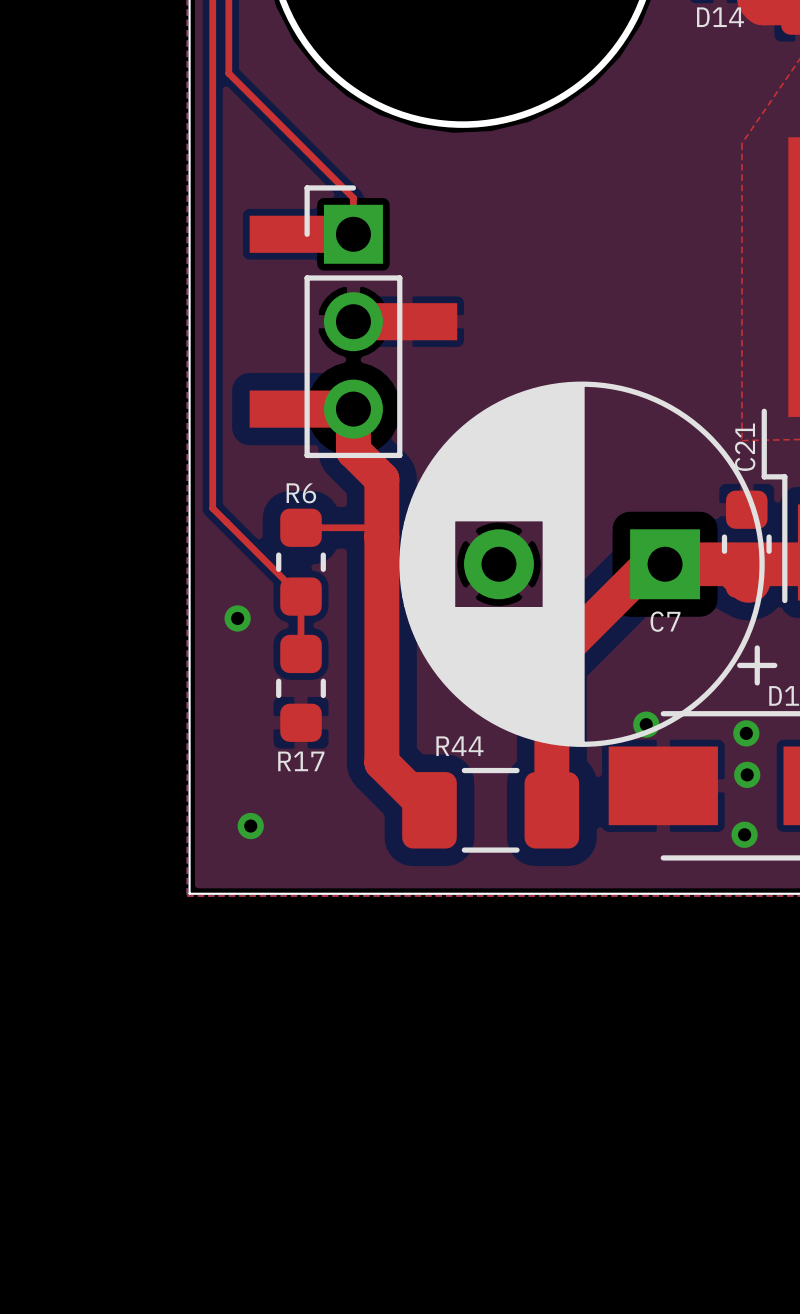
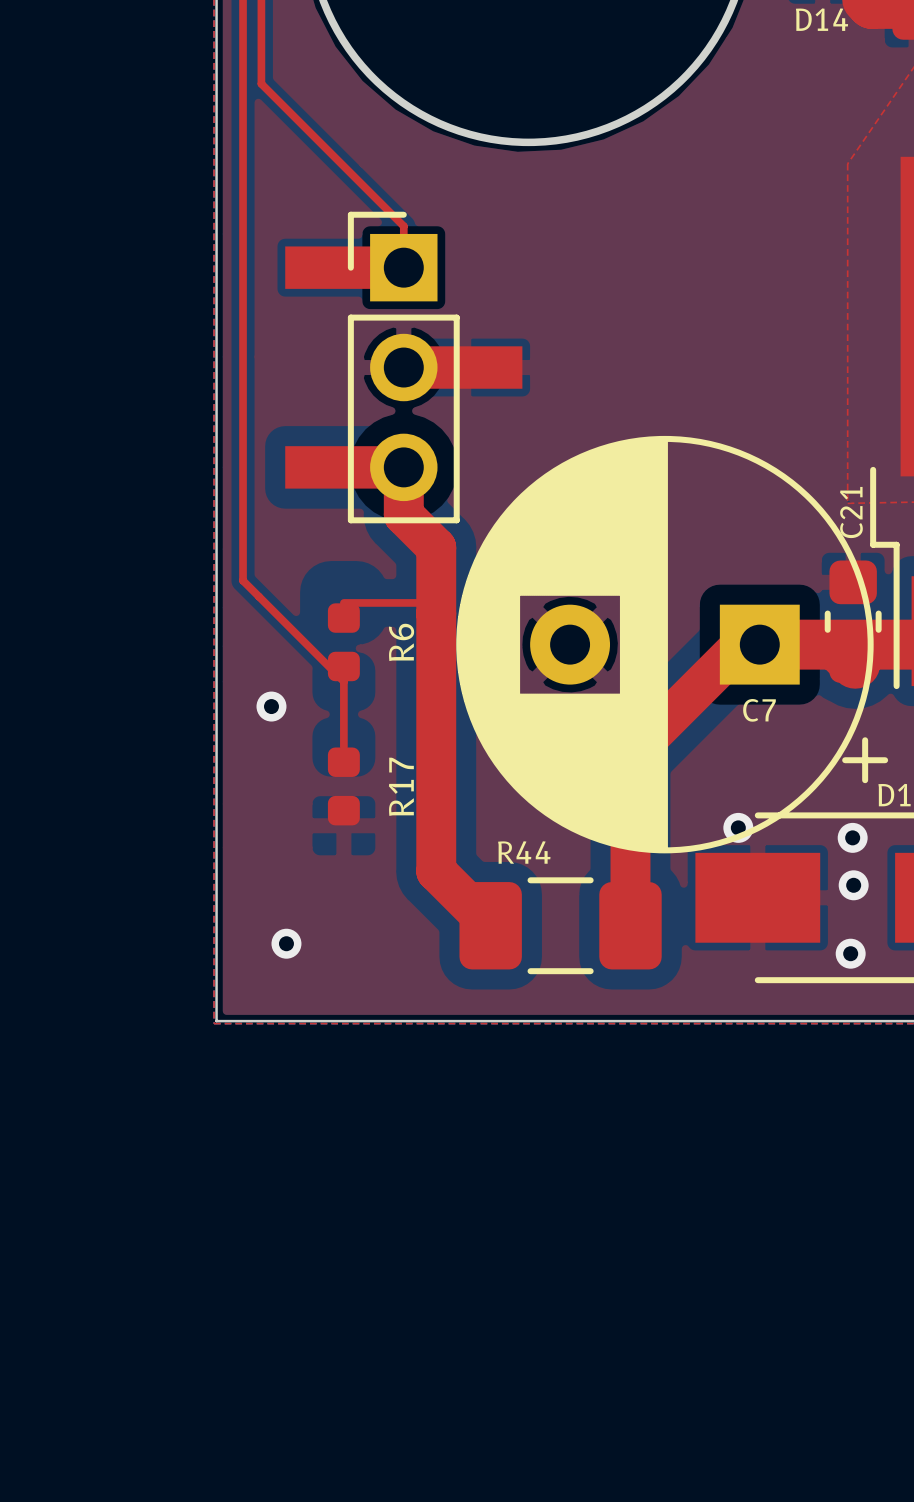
R6 footprint: [276, 508, 326, 616] -> [327, 603, 360, 682]
R17 footprint: [276, 634, 326, 742] -> [327, 747, 360, 826]
R17 name position: R17 (301, 761) -> R17 (401, 786)

